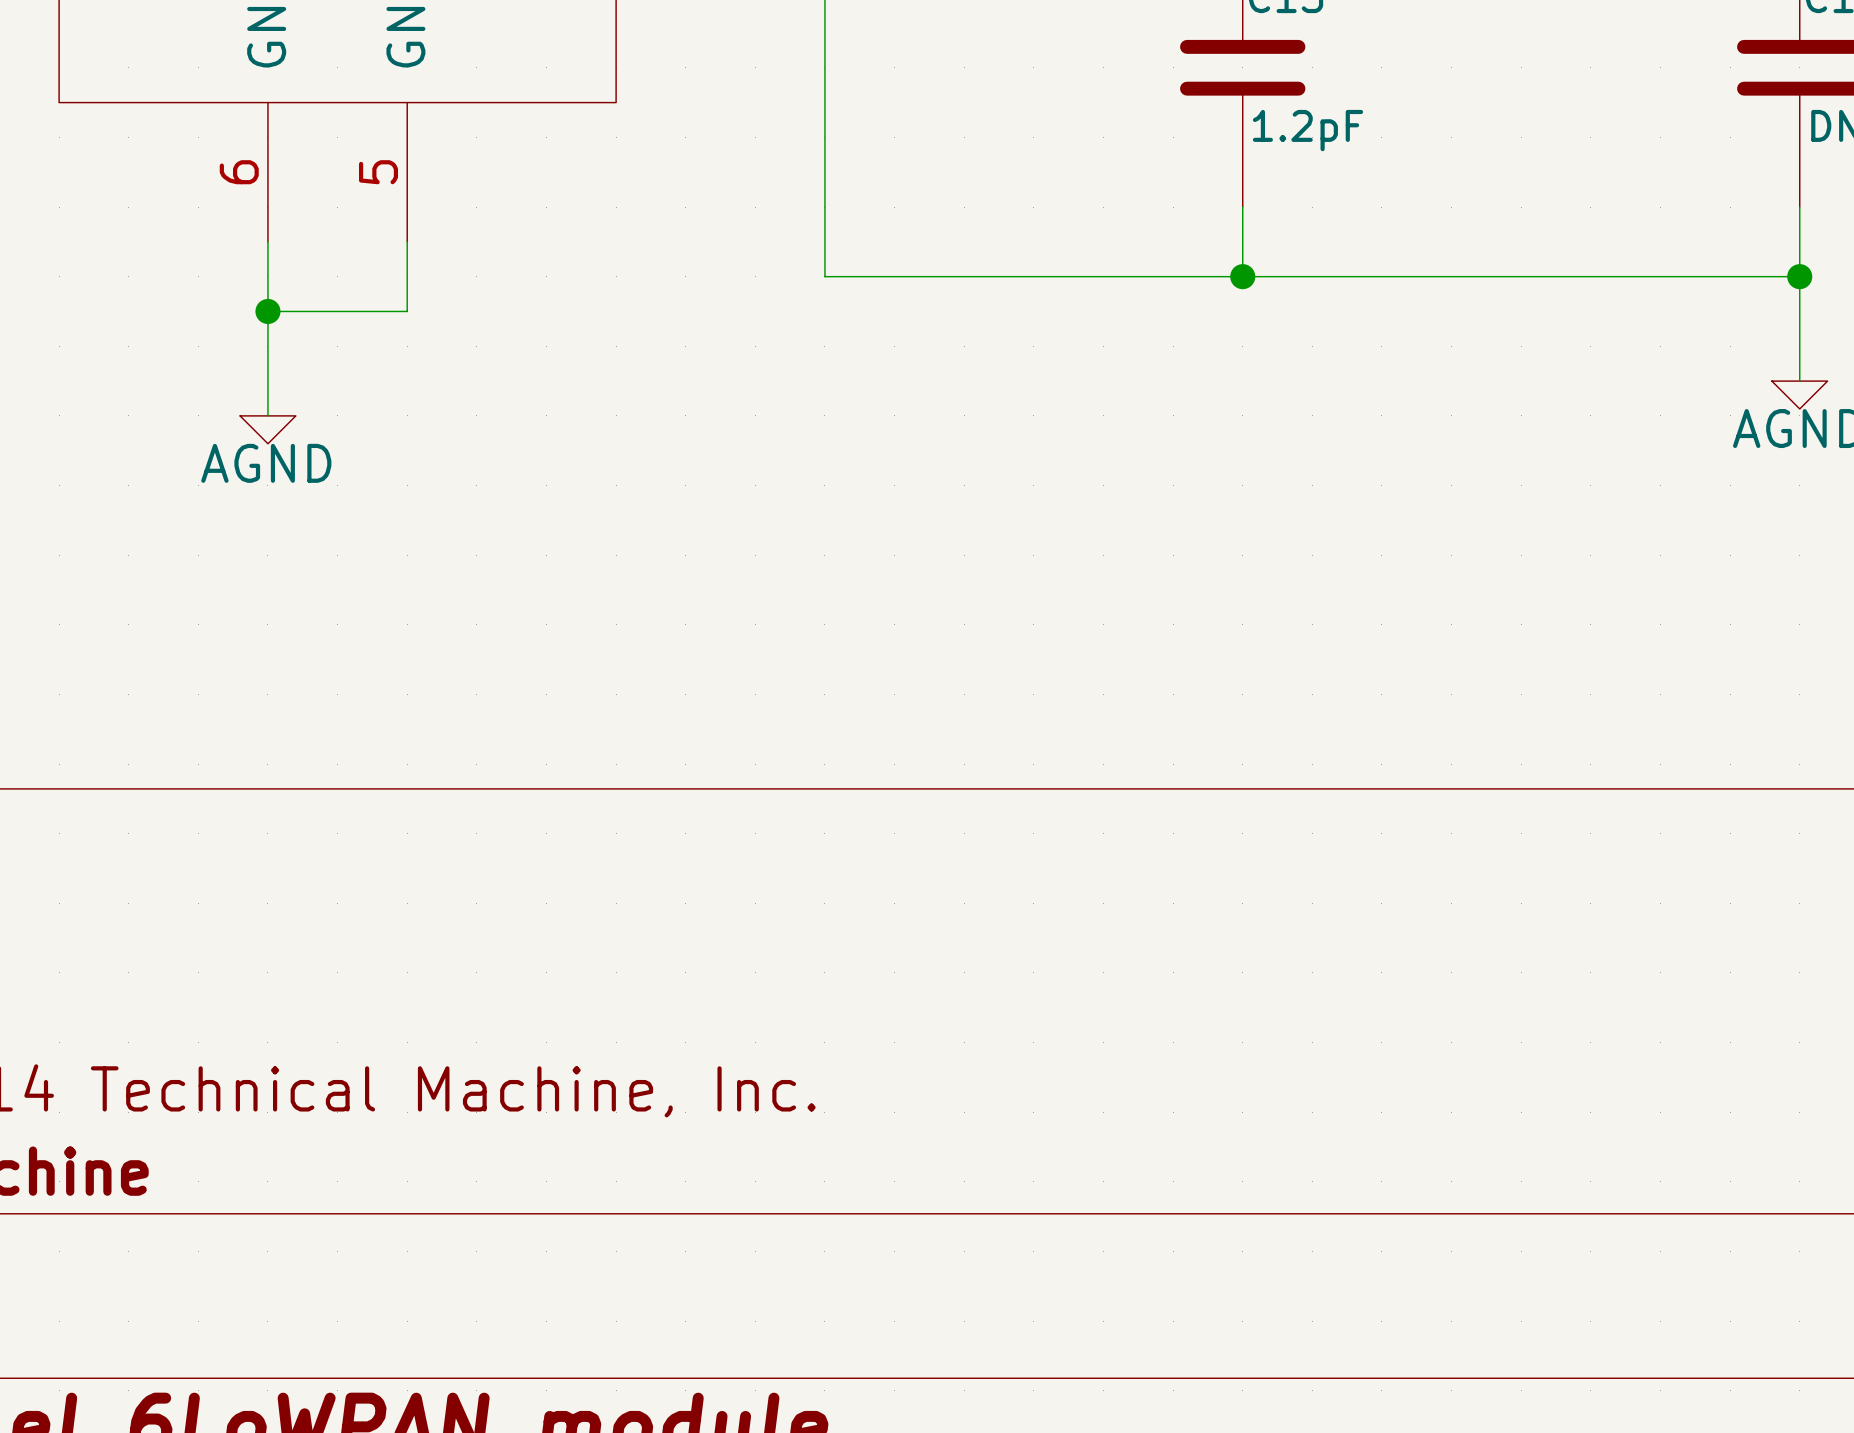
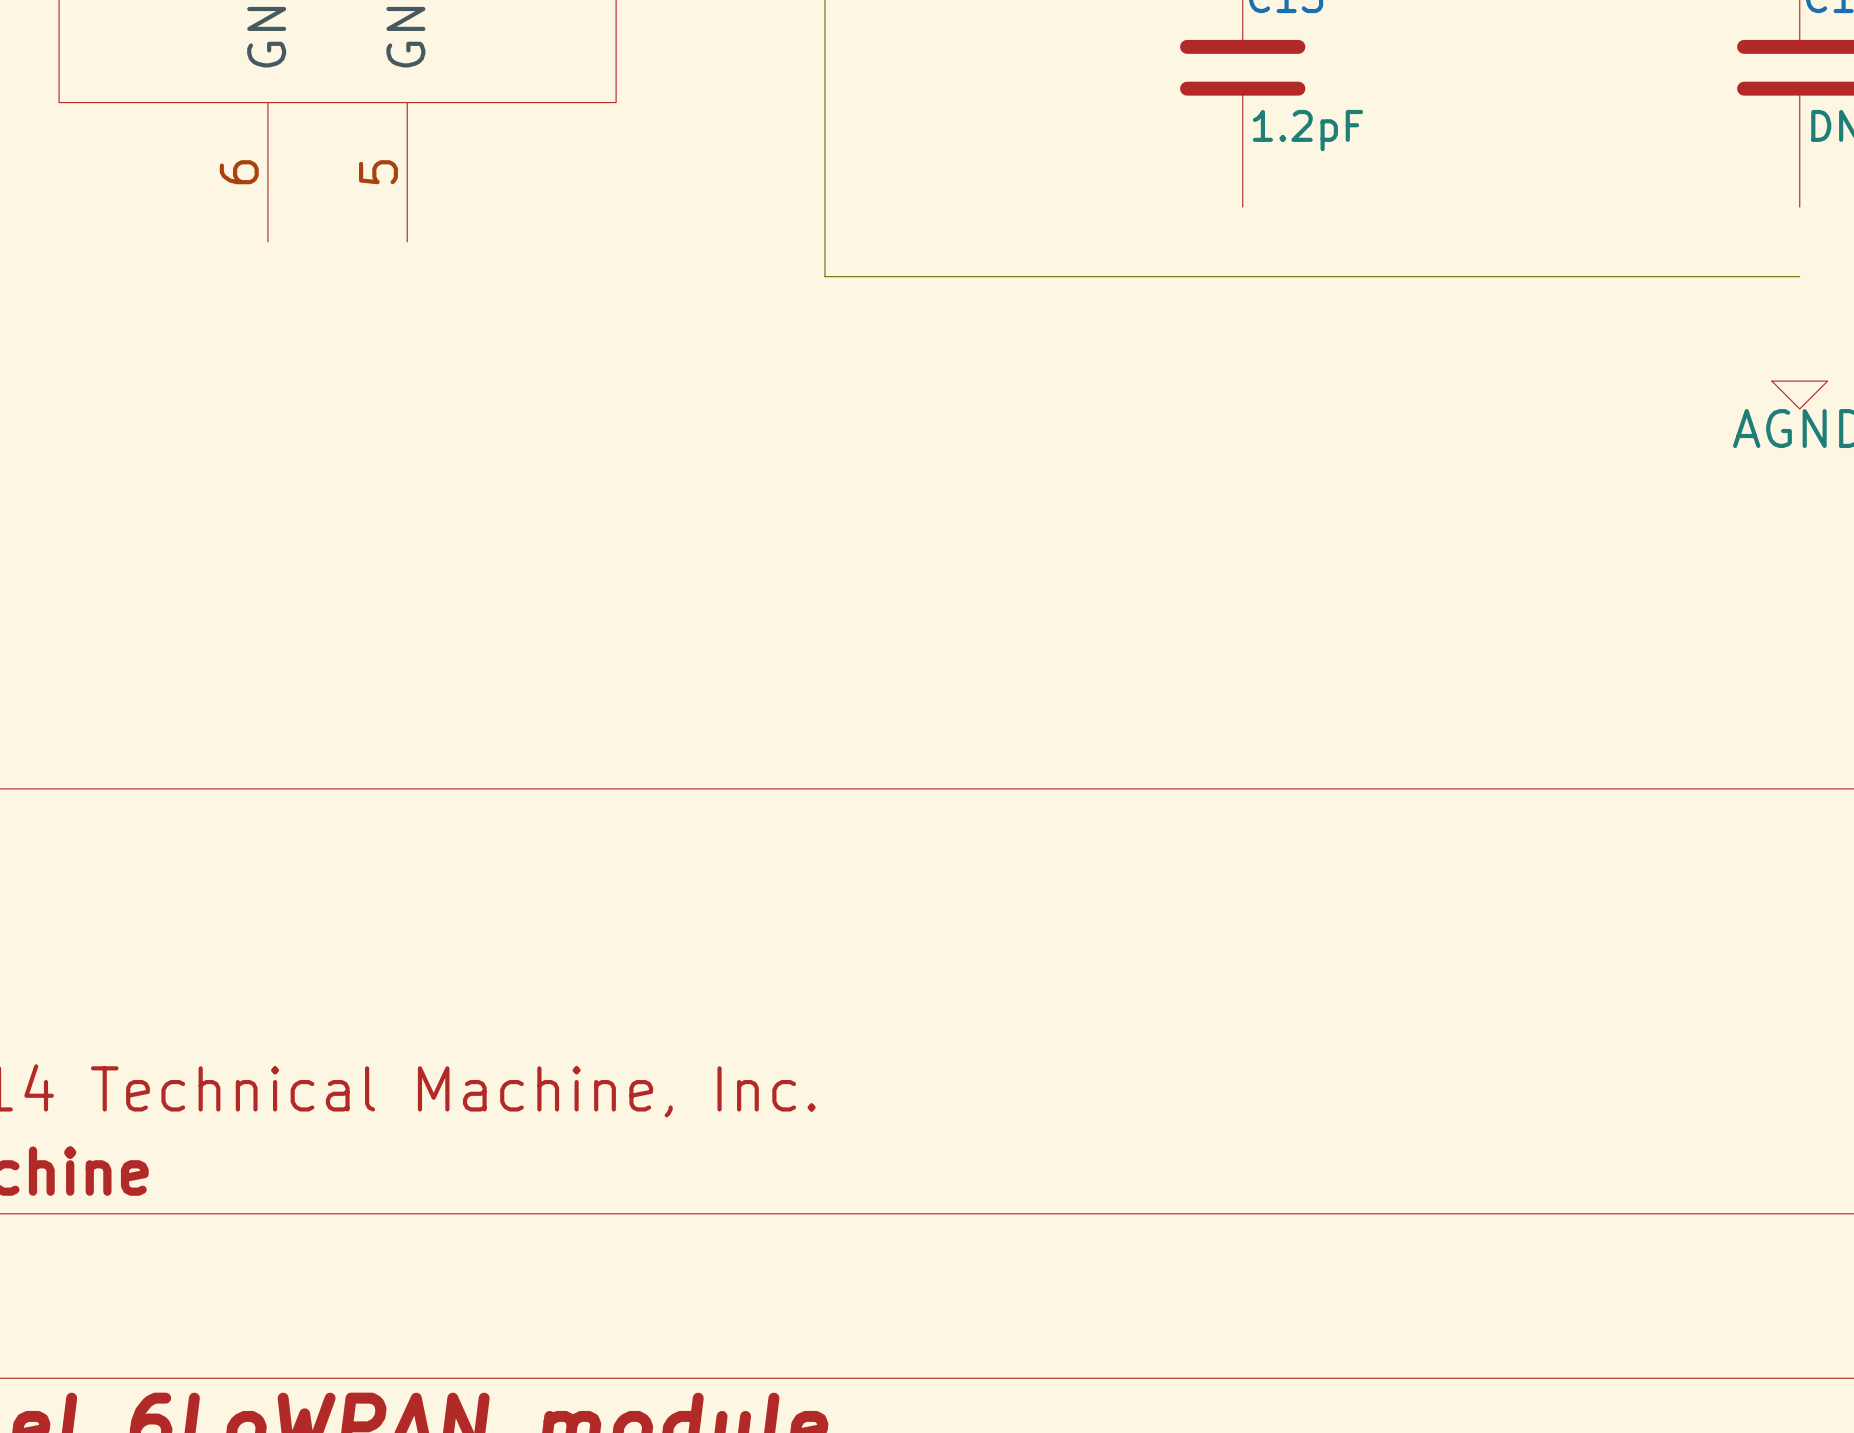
wire: (1242, 207) (1242, 276) -> none
wire: (1799, 207) (1799, 381) -> none
wire: (267, 241) (267, 415) -> none
wire: (407, 241) (407, 311) (267, 311) -> none
junction: (1242, 276) -> none
junction: (1799, 276) -> none
junction: (267, 311) -> none
power symbol: AGND (267, 429) -> none

